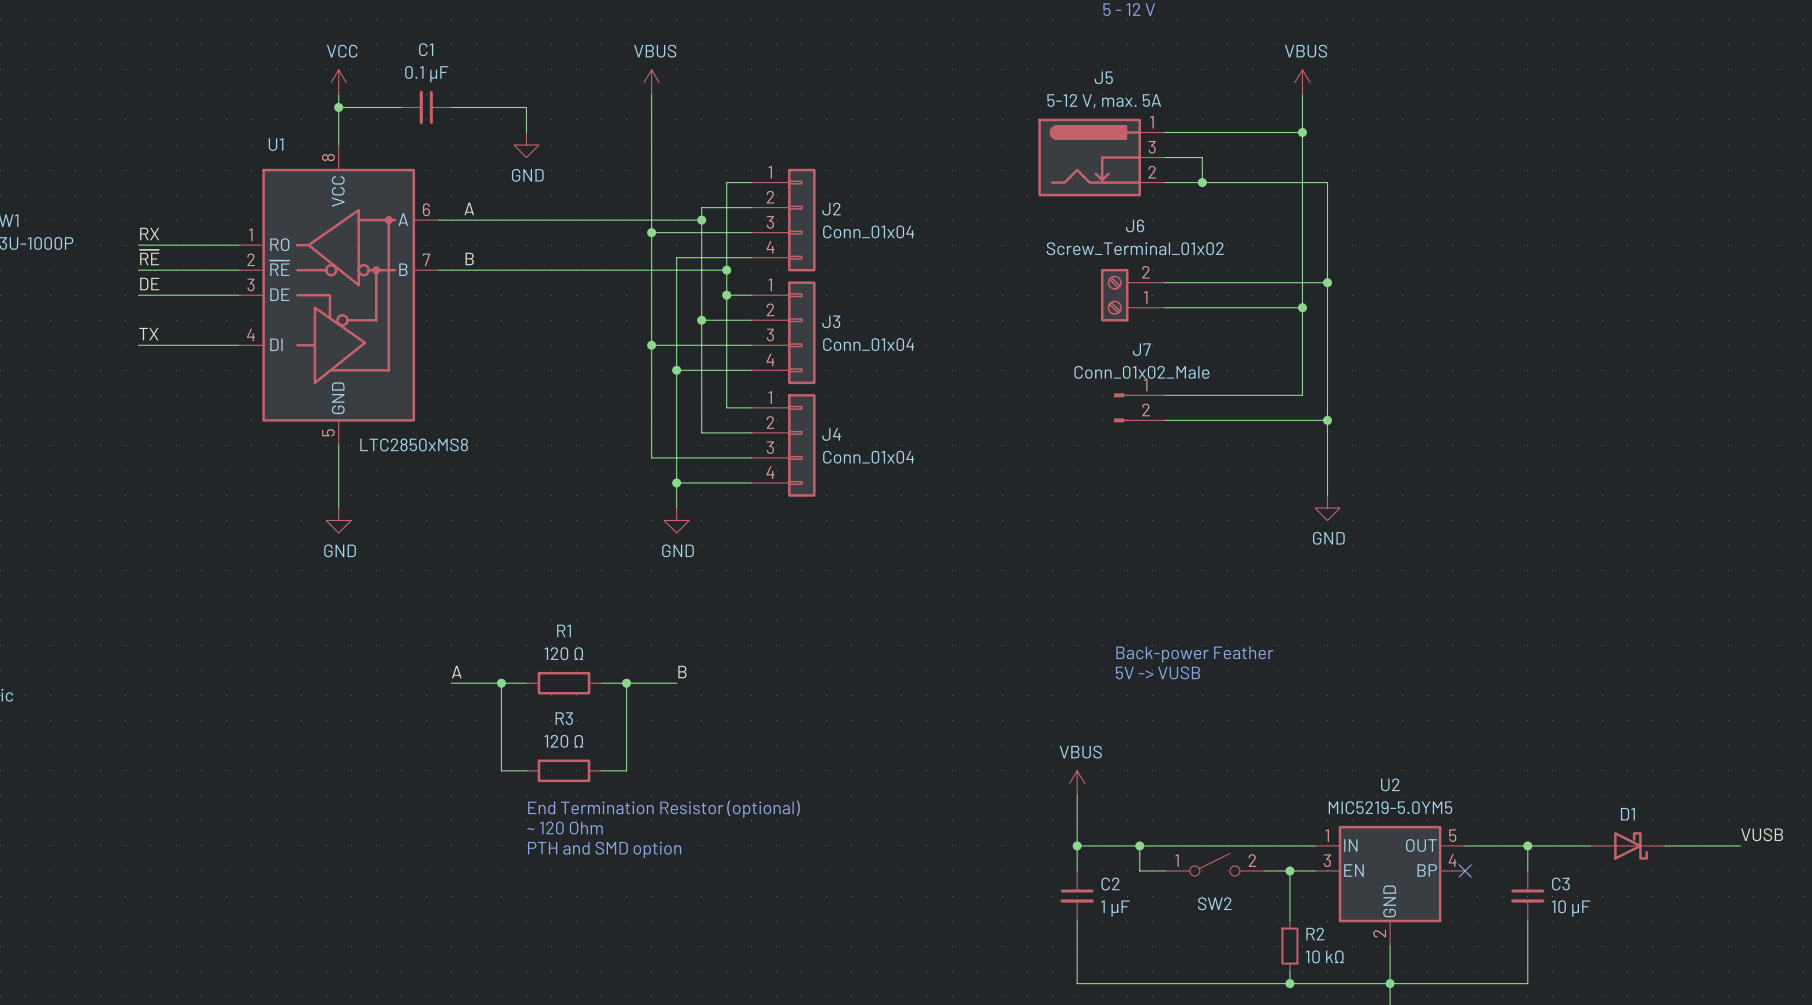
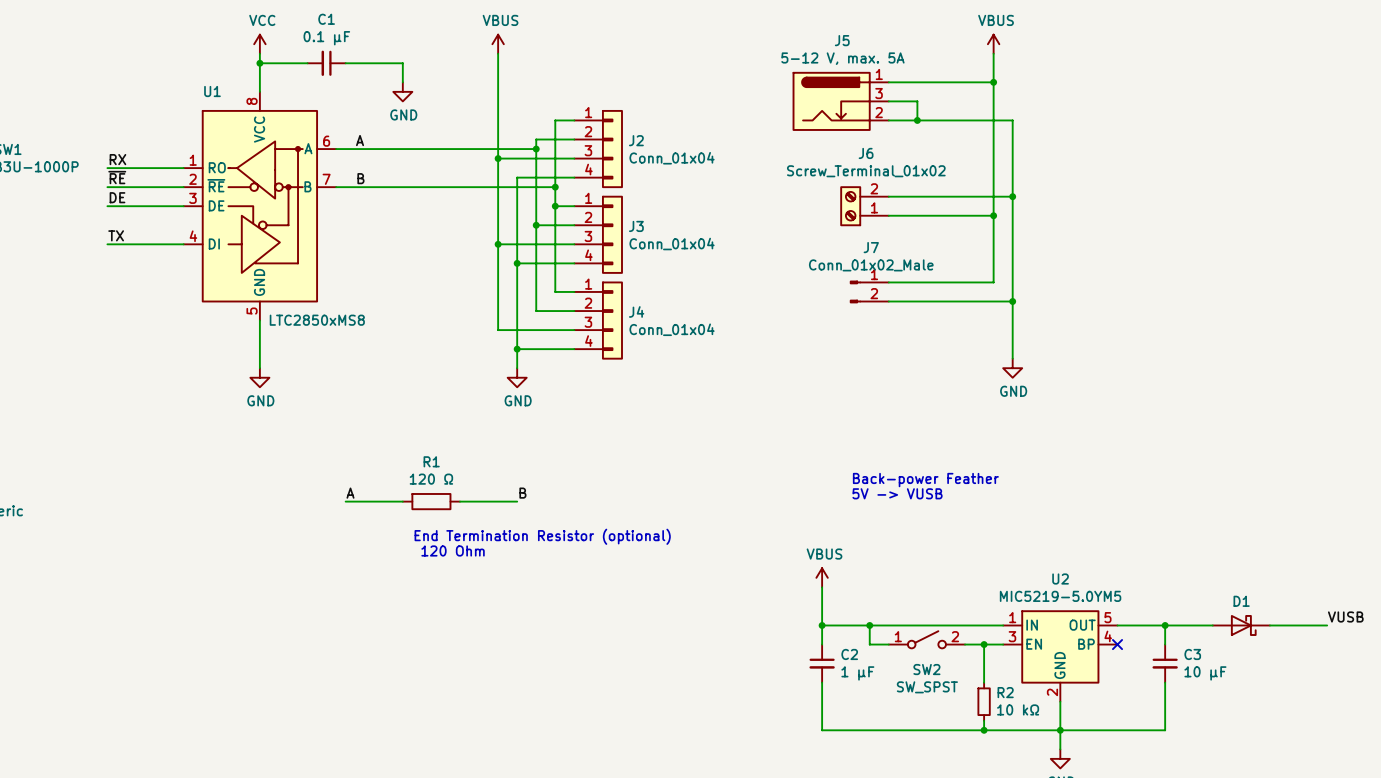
wire: (501, 683) (501, 770) (526, 770) -> none
junction: (501, 683) -> none
wire: (626, 683) (626, 770) (601, 770) -> none
junction: (626, 683) -> none
text: none -> 120 Ohm (453, 550)
R3: 120 Ω (564, 770) -> none
text position: End Termination Resistor (optional) (664, 809) -> End Termination Resistor (optional) (542, 536)
text: ~ 120 Ohm (564, 828) -> none
text: PTH and SMD option (604, 849) -> none
SW2 value: none -> SW_SPST (927, 687)

